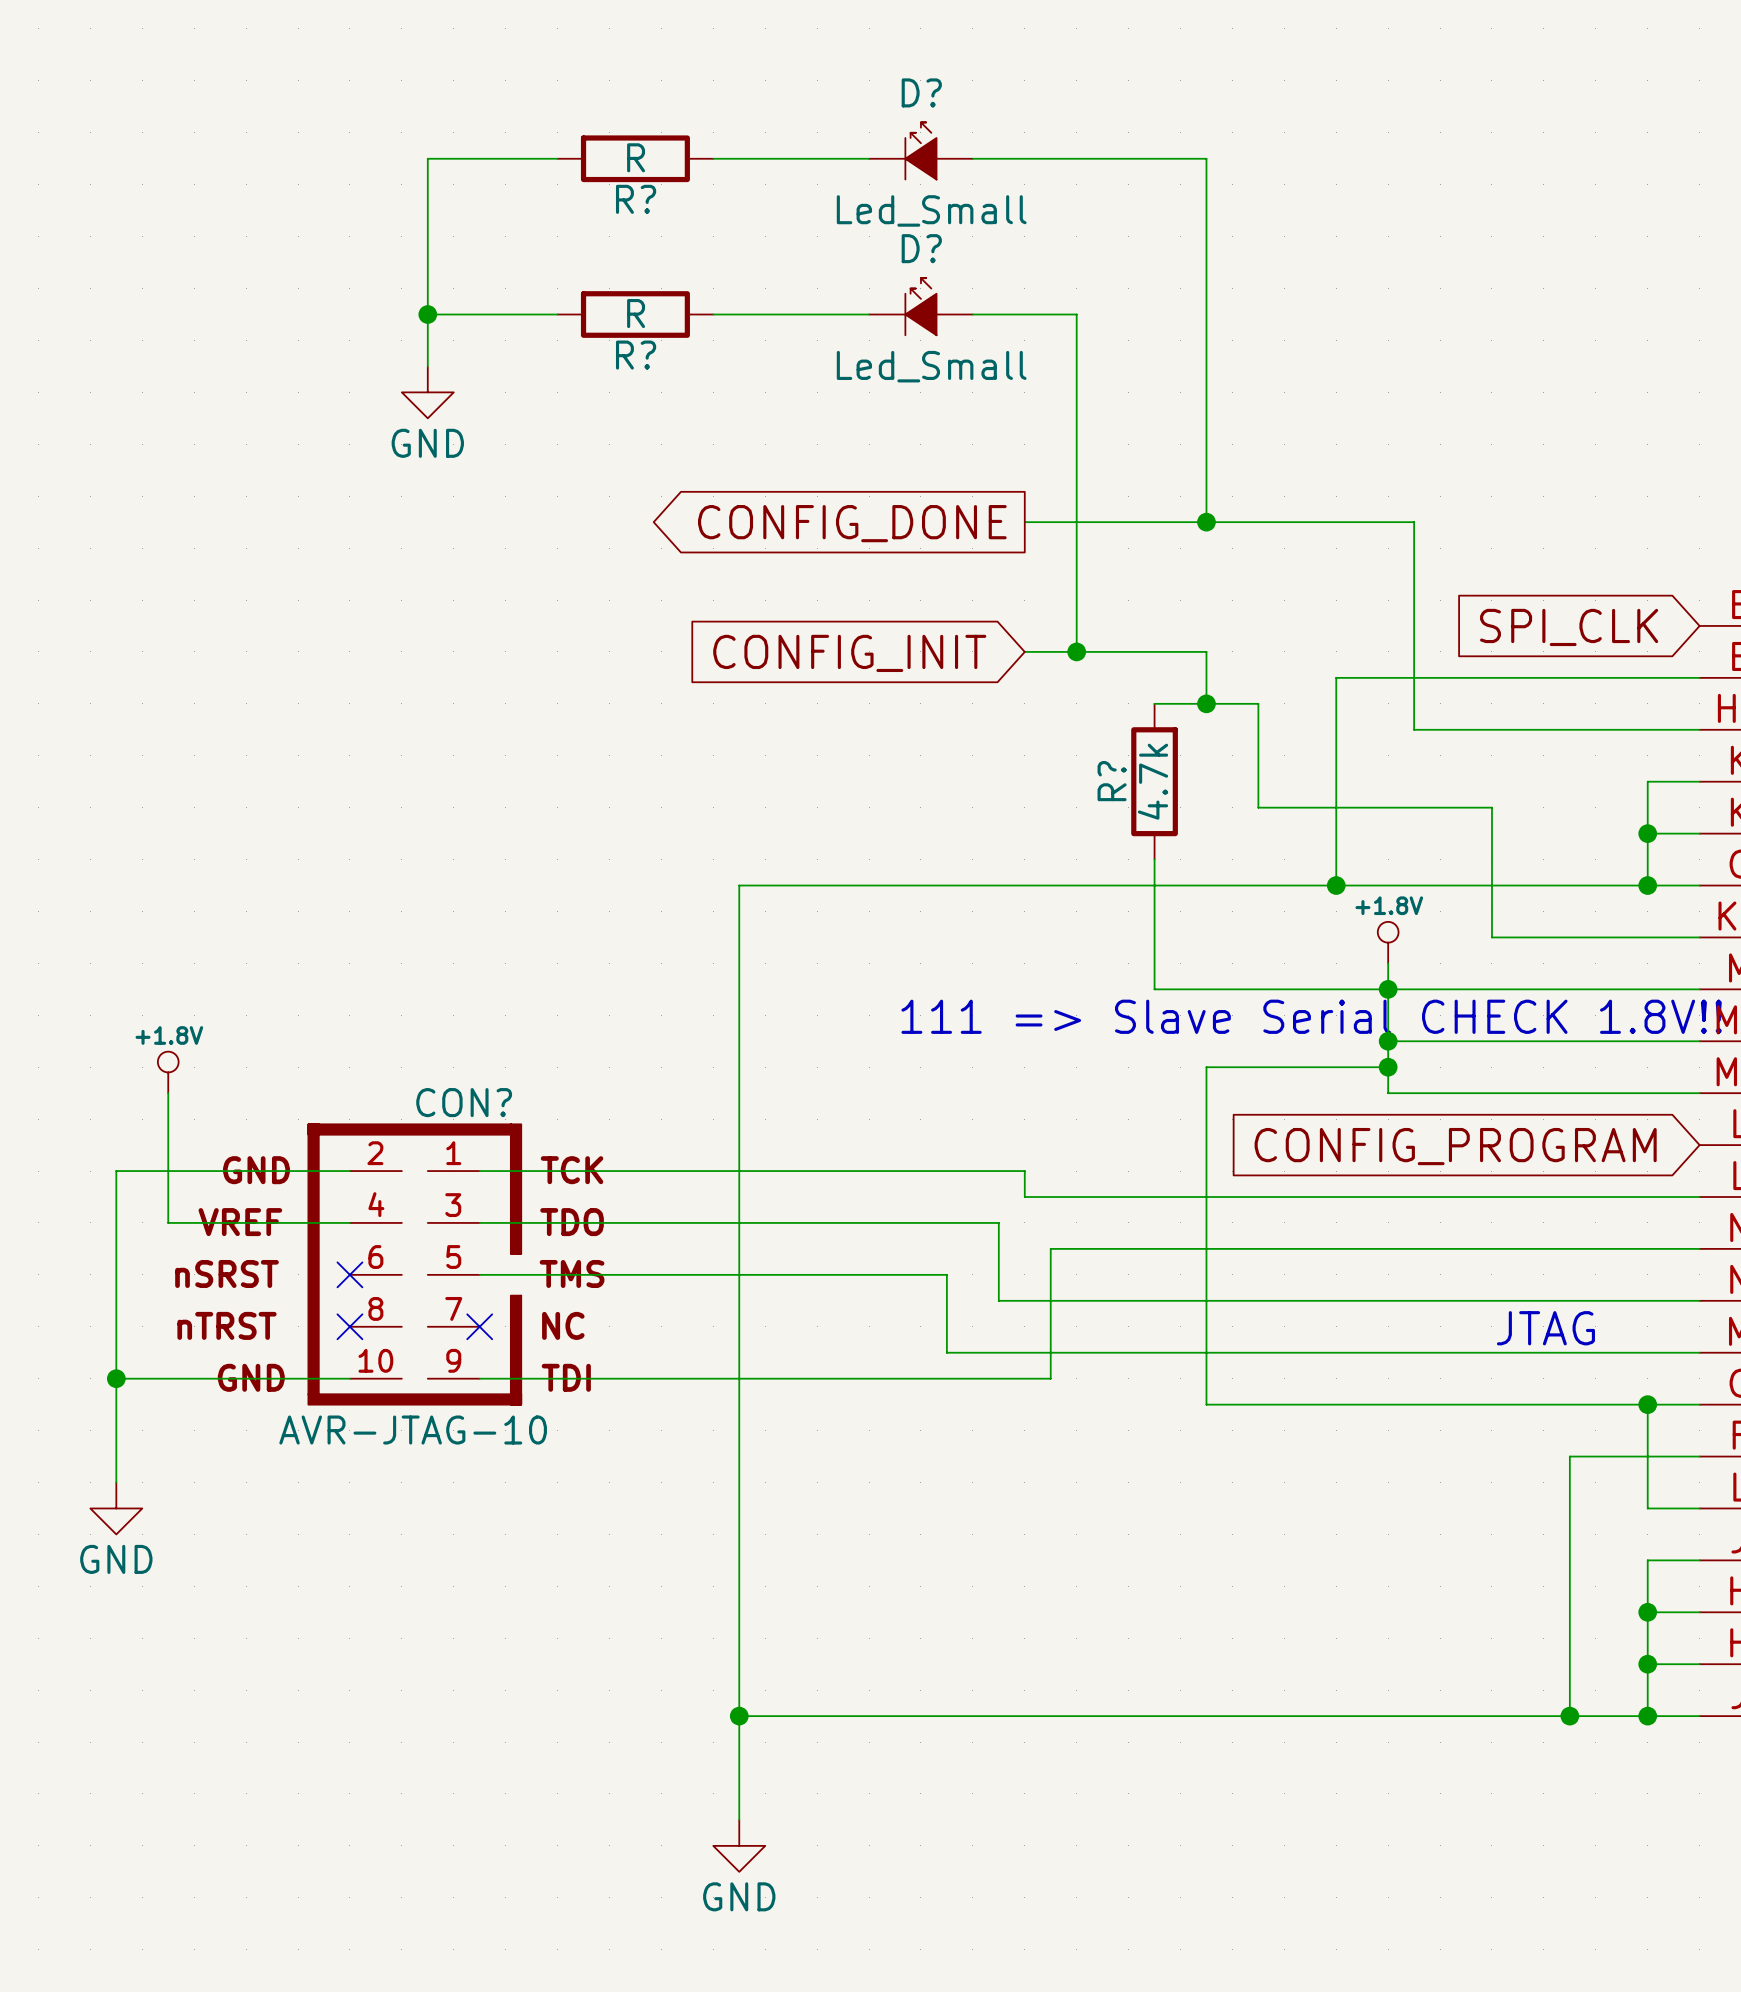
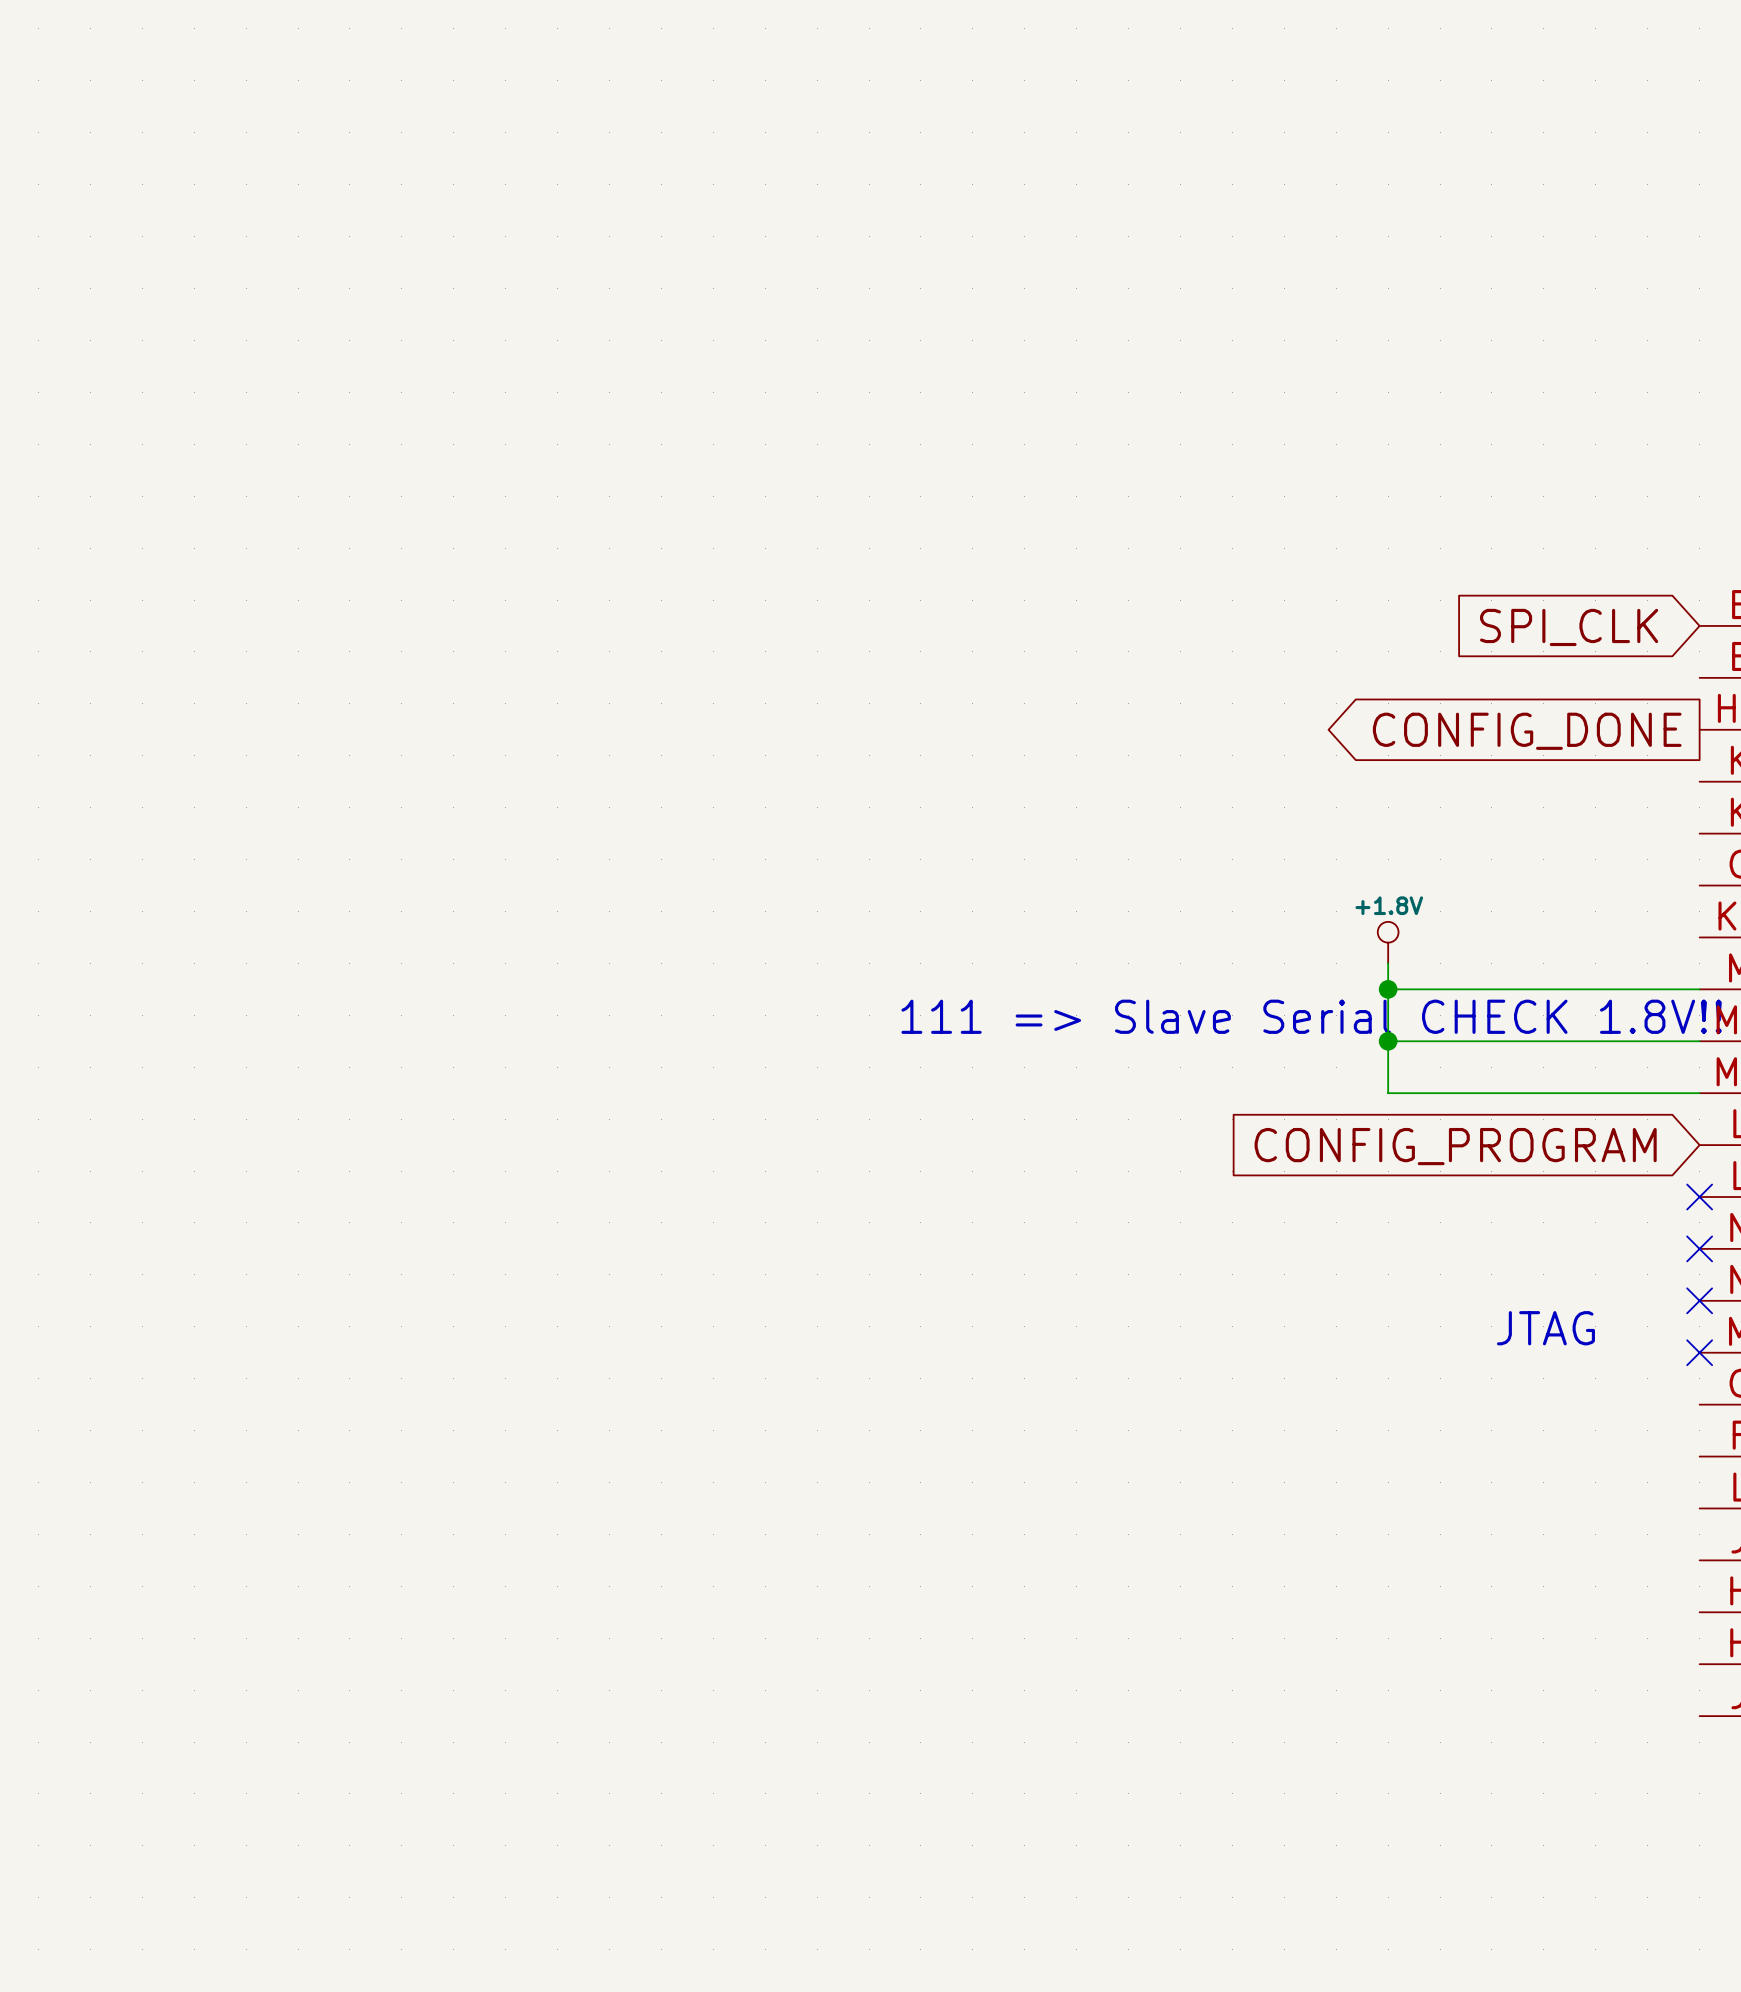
D?: Led_Small (920, 150) -> none
wire: (557, 158) (427, 158) (427, 366) -> none
R?: R (635, 158) -> none
wire: (713, 158) (869, 158) -> none
wire: (972, 158) (1206, 158) (1206, 522) -> none
D?: Led_Small (920, 306) -> none
wire: (427, 314) (557, 314) -> none
junction: (427, 314) -> none
R?: R (635, 314) -> none
wire: (713, 314) (869, 314) -> none
wire: (972, 314) (1076, 314) (1076, 651) -> none
power symbol: GND (427, 392) -> none
wire: (1024, 522) (1414, 522) (1414, 729) (1699, 729) -> none
junction: (1206, 522) -> none
global label: CONFIG_DONE (852, 523) -> none
wire: (1024, 651) (1206, 651) (1206, 703) -> none
junction: (1076, 651) -> none
global label: CONFIG_INIT (849, 653) -> none
wire: (1699, 677) (1336, 677) (1336, 885) -> none
wire: (1154, 703) (1258, 703) (1258, 807) (1491, 807) (1491, 937) (1699, 937) -> none
junction: (1206, 703) -> none
global label: none -> CONFIG_DONE (1527, 731)
R?: 4.7k (1154, 781) -> none
wire: (1699, 781) (1647, 781) (1647, 885) -> none
wire: (1647, 833) (1699, 833) -> none
junction: (1647, 833) -> none
wire: (1154, 859) (1154, 989) (1388, 989) -> none
junction: (1336, 885) -> none
junction: (1647, 885) -> none
wire: (1699, 885) (739, 885) (739, 1819) -> none
wire: (1388, 1067) (1206, 1067) (1206, 1404) (1699, 1404) -> none
junction: (1388, 1067) -> none
power symbol: +1.8V (168, 1072) -> none
wire: (168, 1093) (168, 1222) (349, 1222) -> none
wire: (349, 1171) (116, 1171) (116, 1482) -> none
wire: (479, 1171) (1024, 1171) (1024, 1197) (1699, 1197) -> none
no-connect mark: none -> (1699, 1197)
wire: (479, 1222) (998, 1222) (998, 1300) (1699, 1300) -> none
wire: (1699, 1248) (1050, 1248) (1050, 1378) (479, 1378) -> none
no-connect mark: none -> (1699, 1248)
CON?: AVR-JTAG-10 (414, 1264) -> none
no-connect mark: (349, 1274) -> none
wire: (479, 1274) (946, 1274) (946, 1352) (1699, 1352) -> none
no-connect mark: none -> (1699, 1300)
no-connect mark: (349, 1326) -> none
no-connect mark: (479, 1326) -> none
no-connect mark: none -> (1699, 1352)
wire: (116, 1378) (349, 1378) -> none
junction: (116, 1378) -> none
wire: (1647, 1404) (1647, 1508) (1699, 1508) -> none
junction: (1647, 1404) -> none
wire: (1699, 1456) (1569, 1456) (1569, 1716) -> none
power symbol: GND (116, 1508) -> none
wire: (1699, 1560) (1647, 1560) (1647, 1716) -> none
wire: (1647, 1612) (1699, 1612) -> none
junction: (1647, 1612) -> none
wire: (1647, 1664) (1699, 1664) -> none
junction: (1647, 1664) -> none
wire: (739, 1716) (1699, 1716) -> none
junction: (739, 1716) -> none
junction: (1569, 1716) -> none
junction: (1647, 1716) -> none
power symbol: GND (739, 1845) -> none

